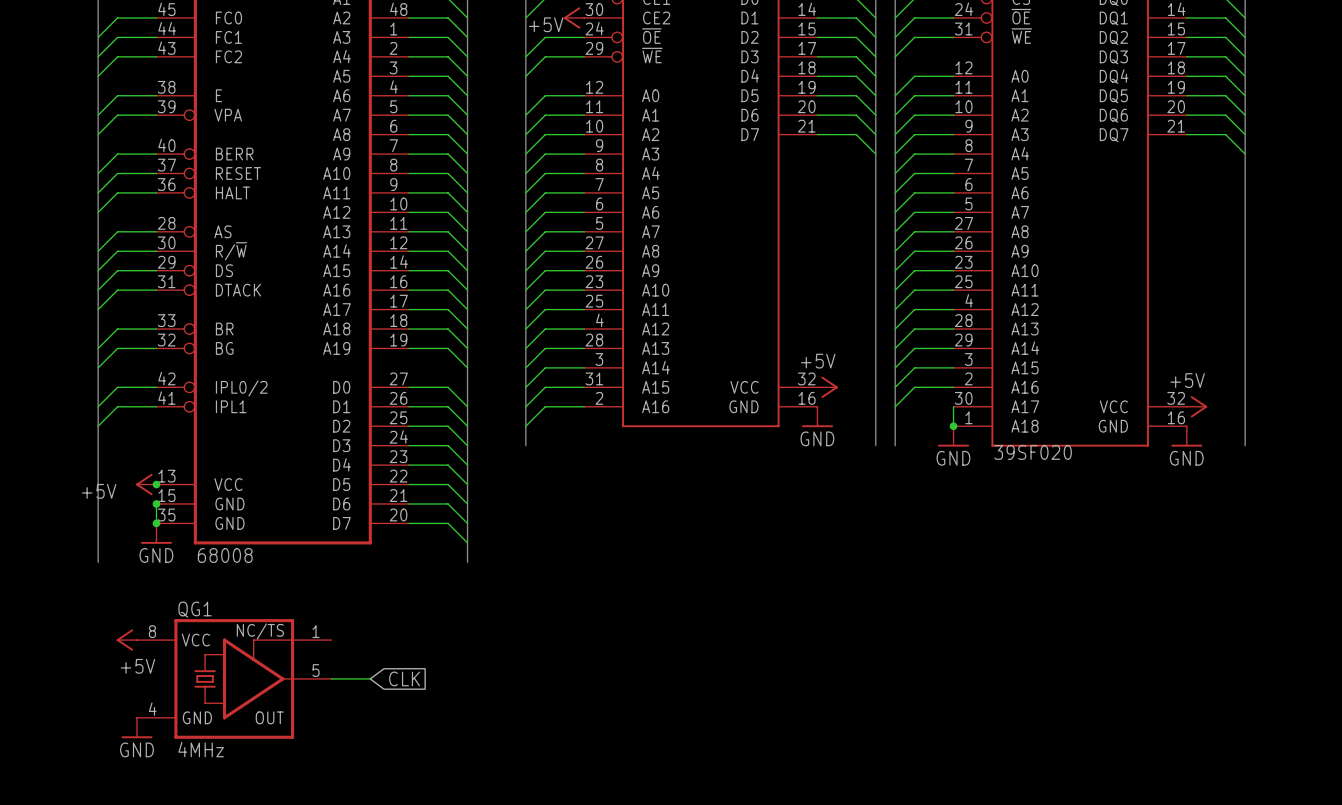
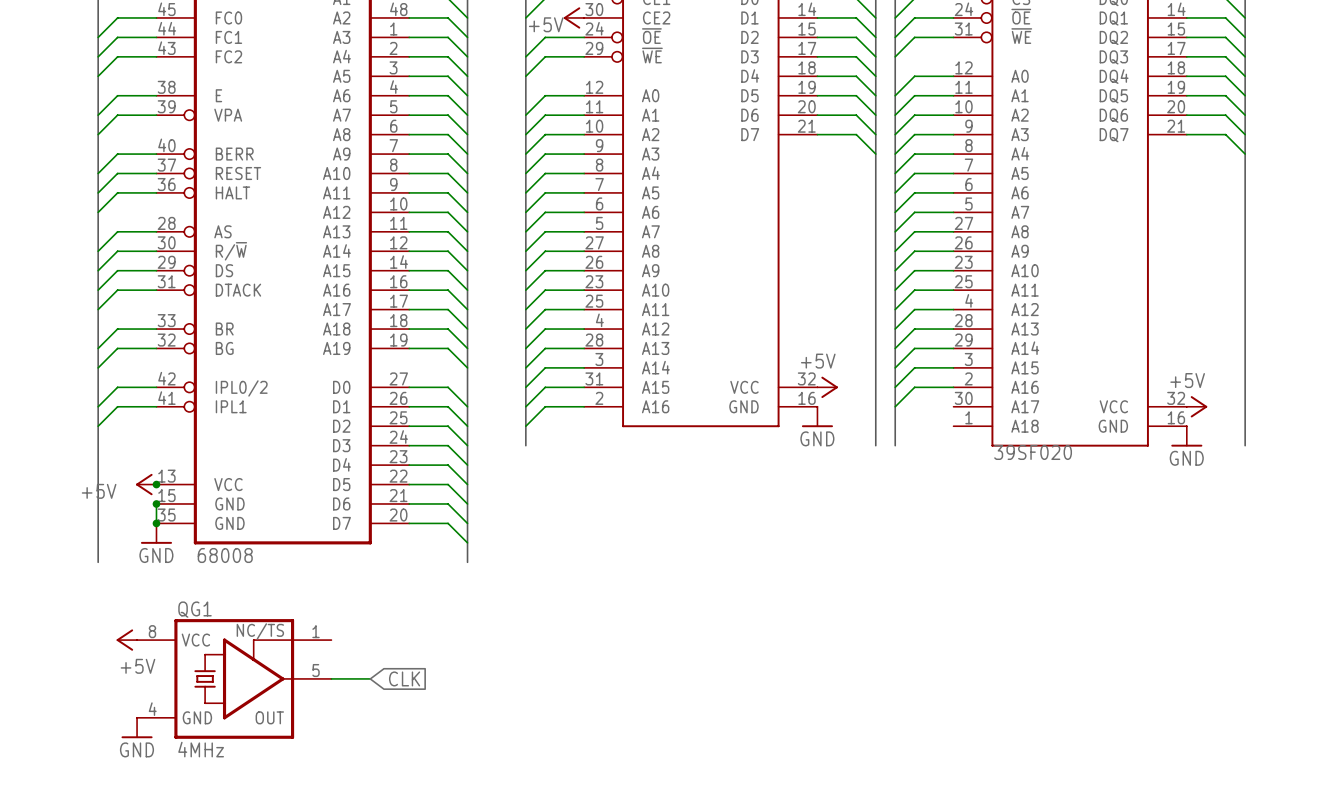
wire: (953, 406) (953, 426) -> none
junction: (953, 426) -> none
power symbol: GND (953, 436) -> none

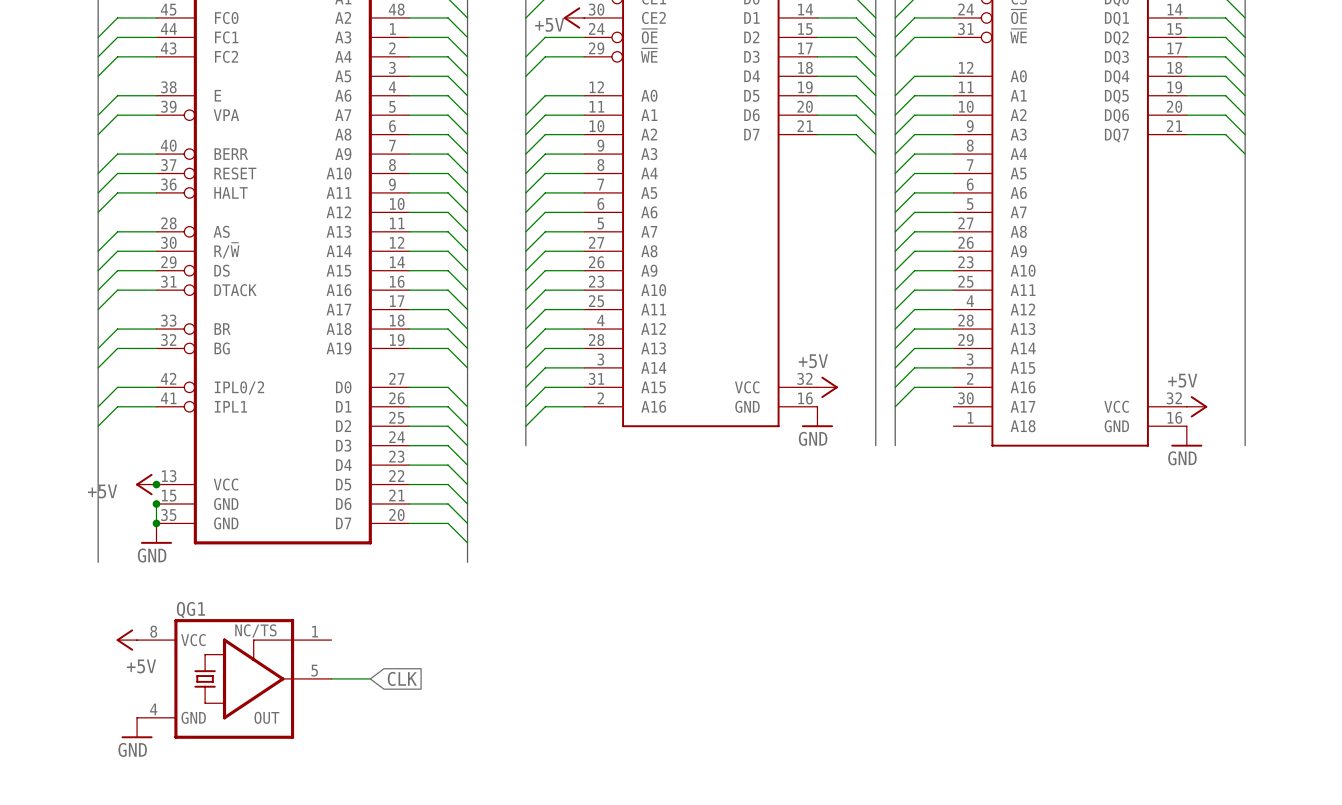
part value: 39SF020 (1033, 452) -> none
part value: 68008 (225, 555) -> none
QG1 value: 4MHz (201, 749) -> none

